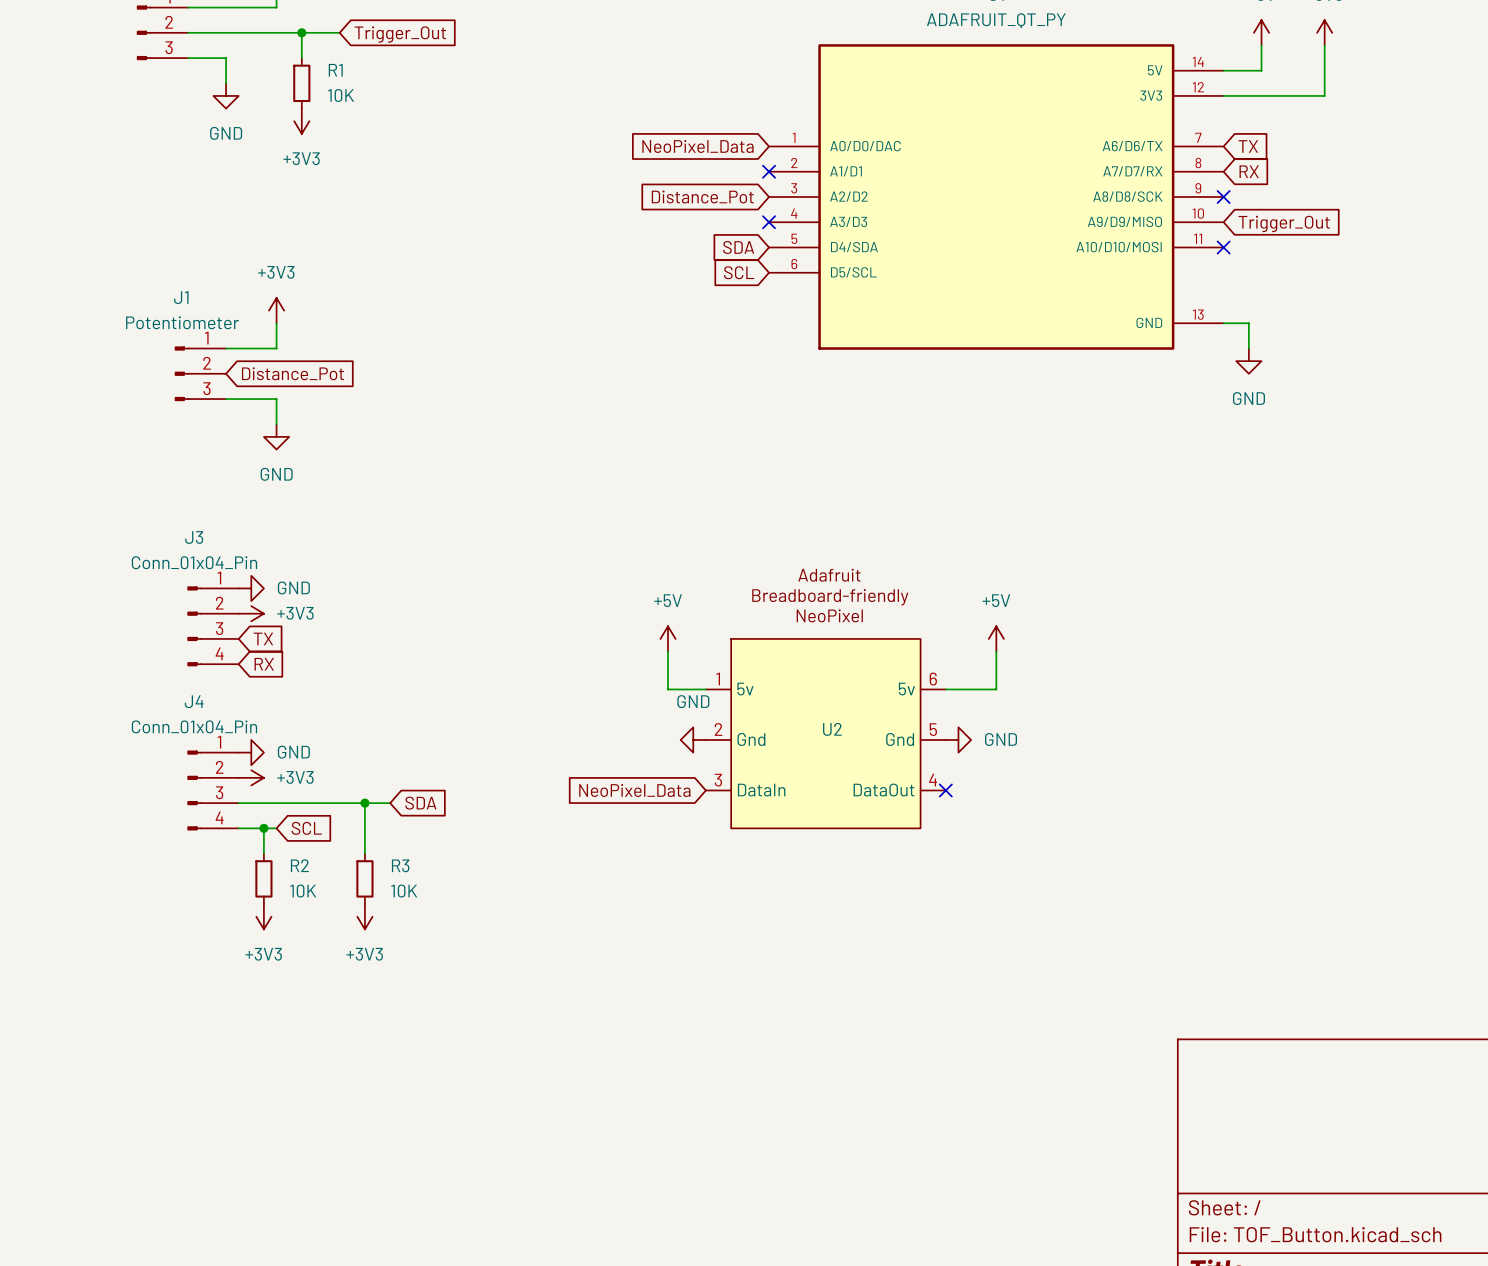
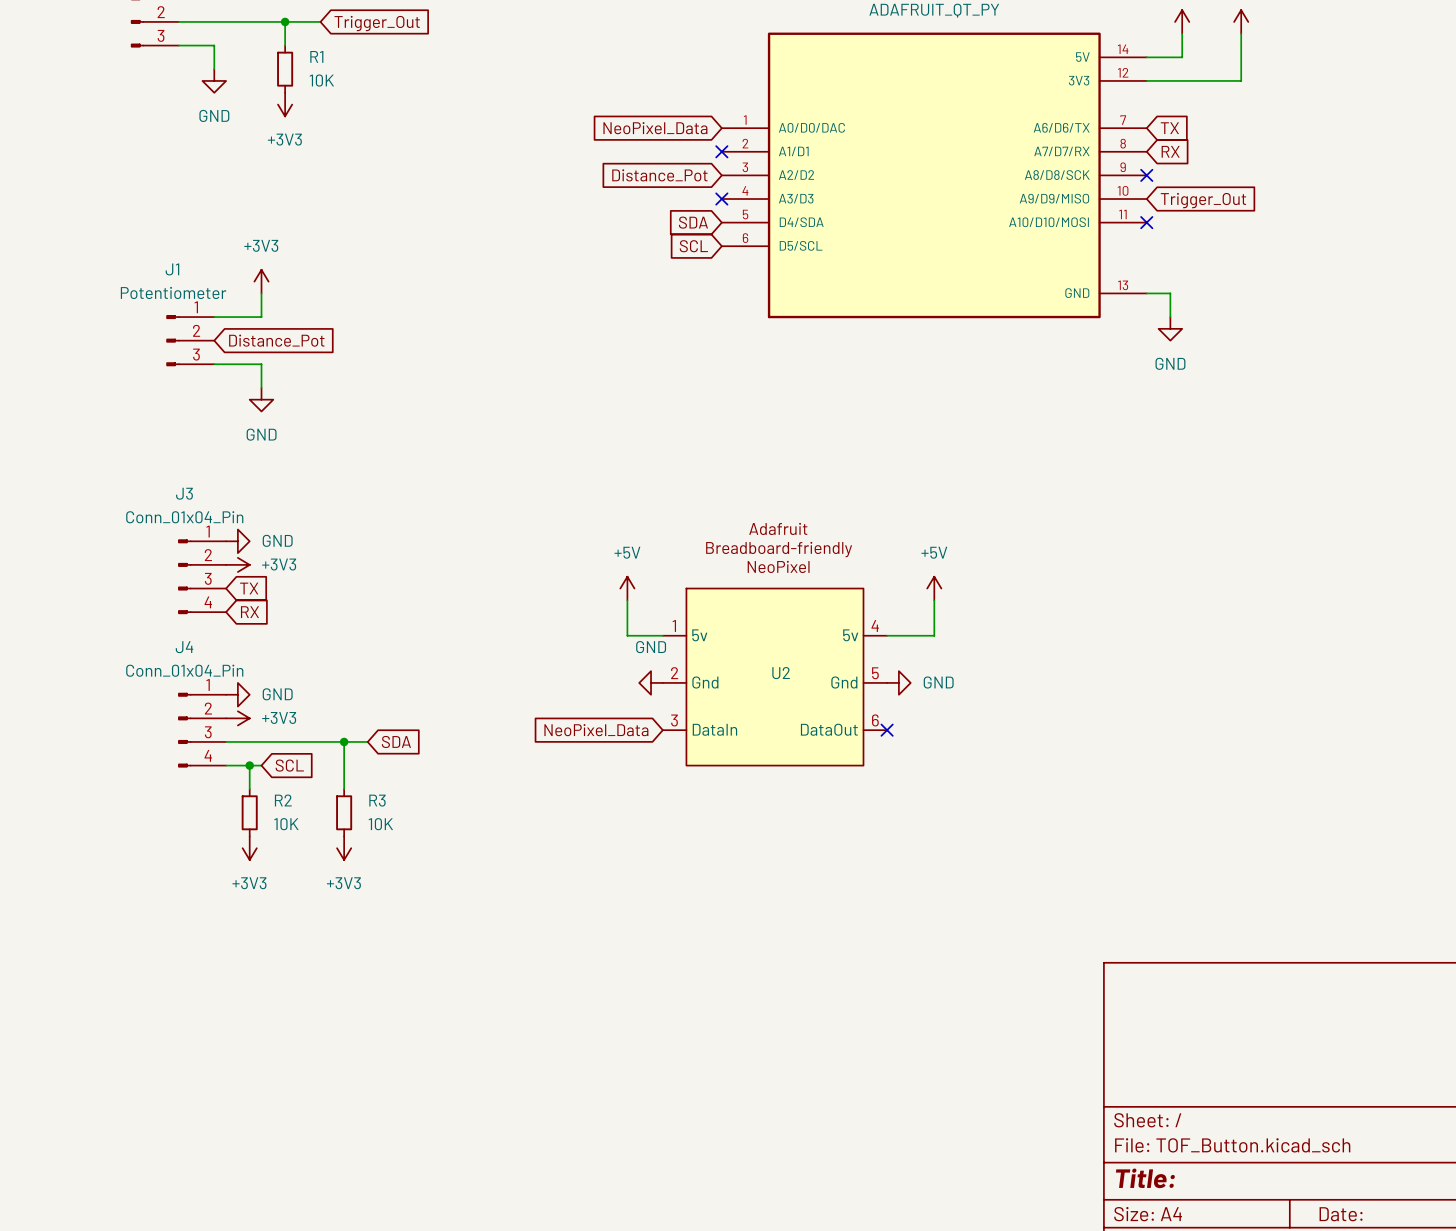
U2 pin number: 6 (933, 679) -> 4 (875, 626)
U2 pin number: 4 (933, 780) -> 6 (875, 720)

